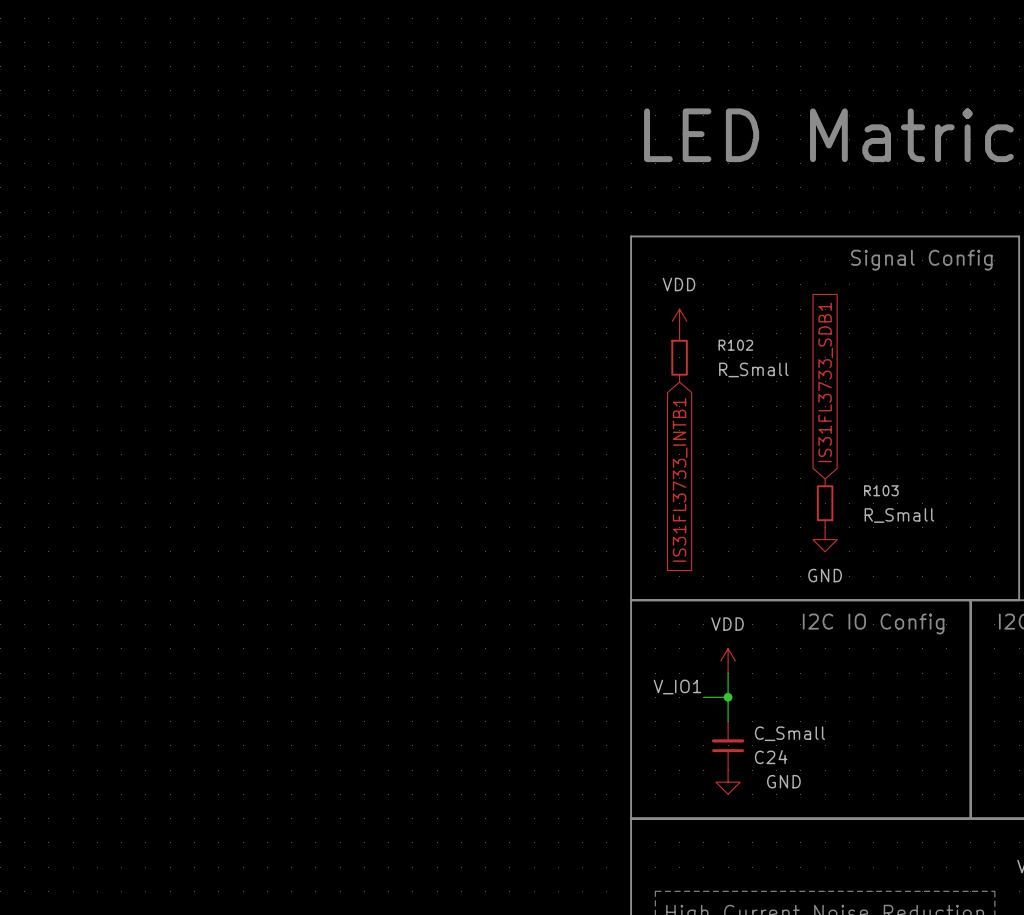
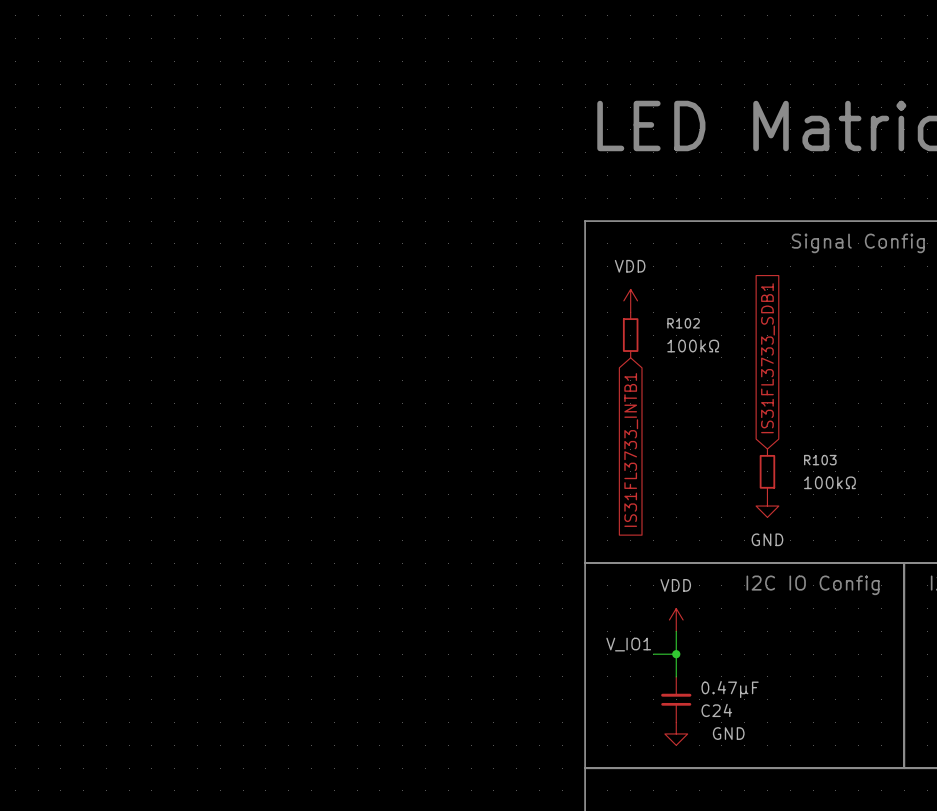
R102 value: R_Small (753, 369) -> 100kΩ (693, 346)
R103 value: R_Small (899, 515) -> 100kΩ (829, 482)
C24 value: C_Small (789, 733) -> 0.47μF (730, 689)

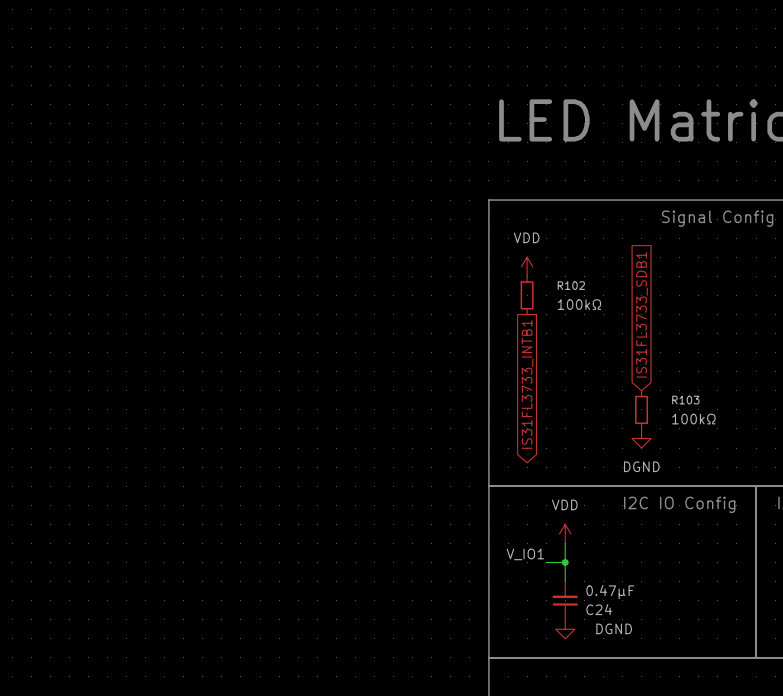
global label shape: input (631, 450) -> output (527, 384)
power symbol: GND (767, 506) -> DGND (641, 438)
power symbol: GND (676, 733) -> DGND (565, 629)

